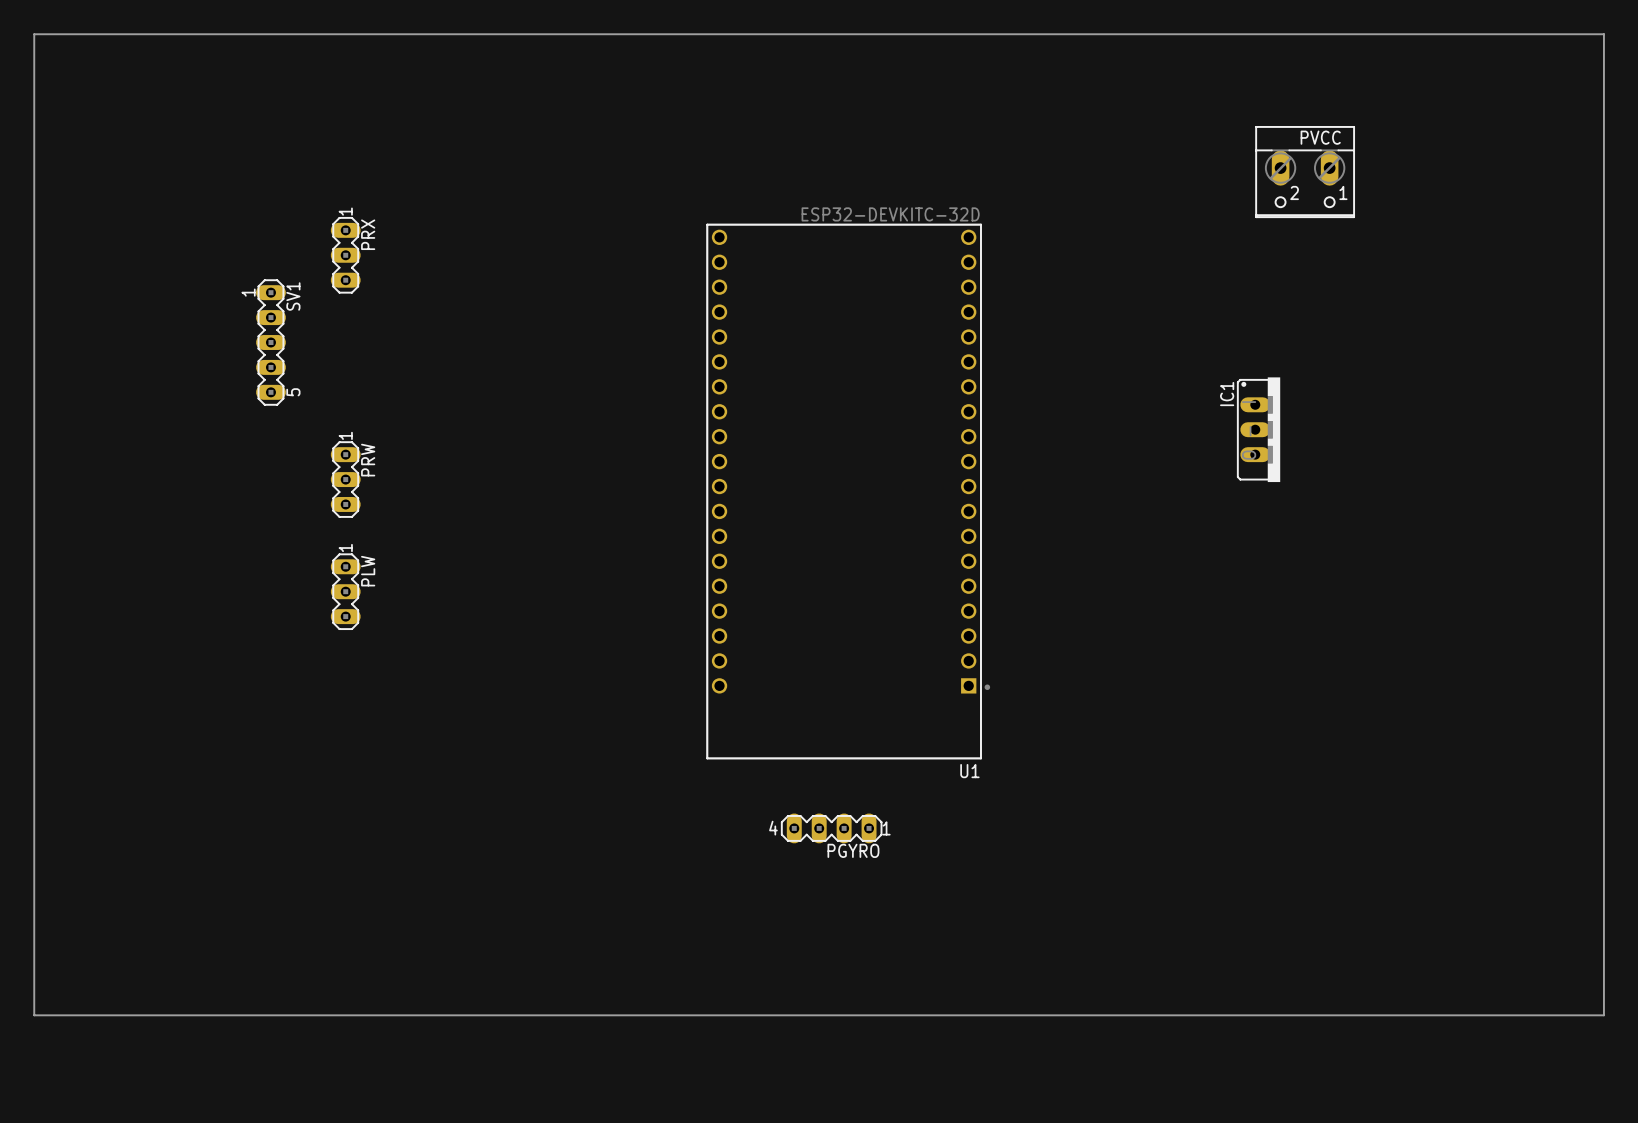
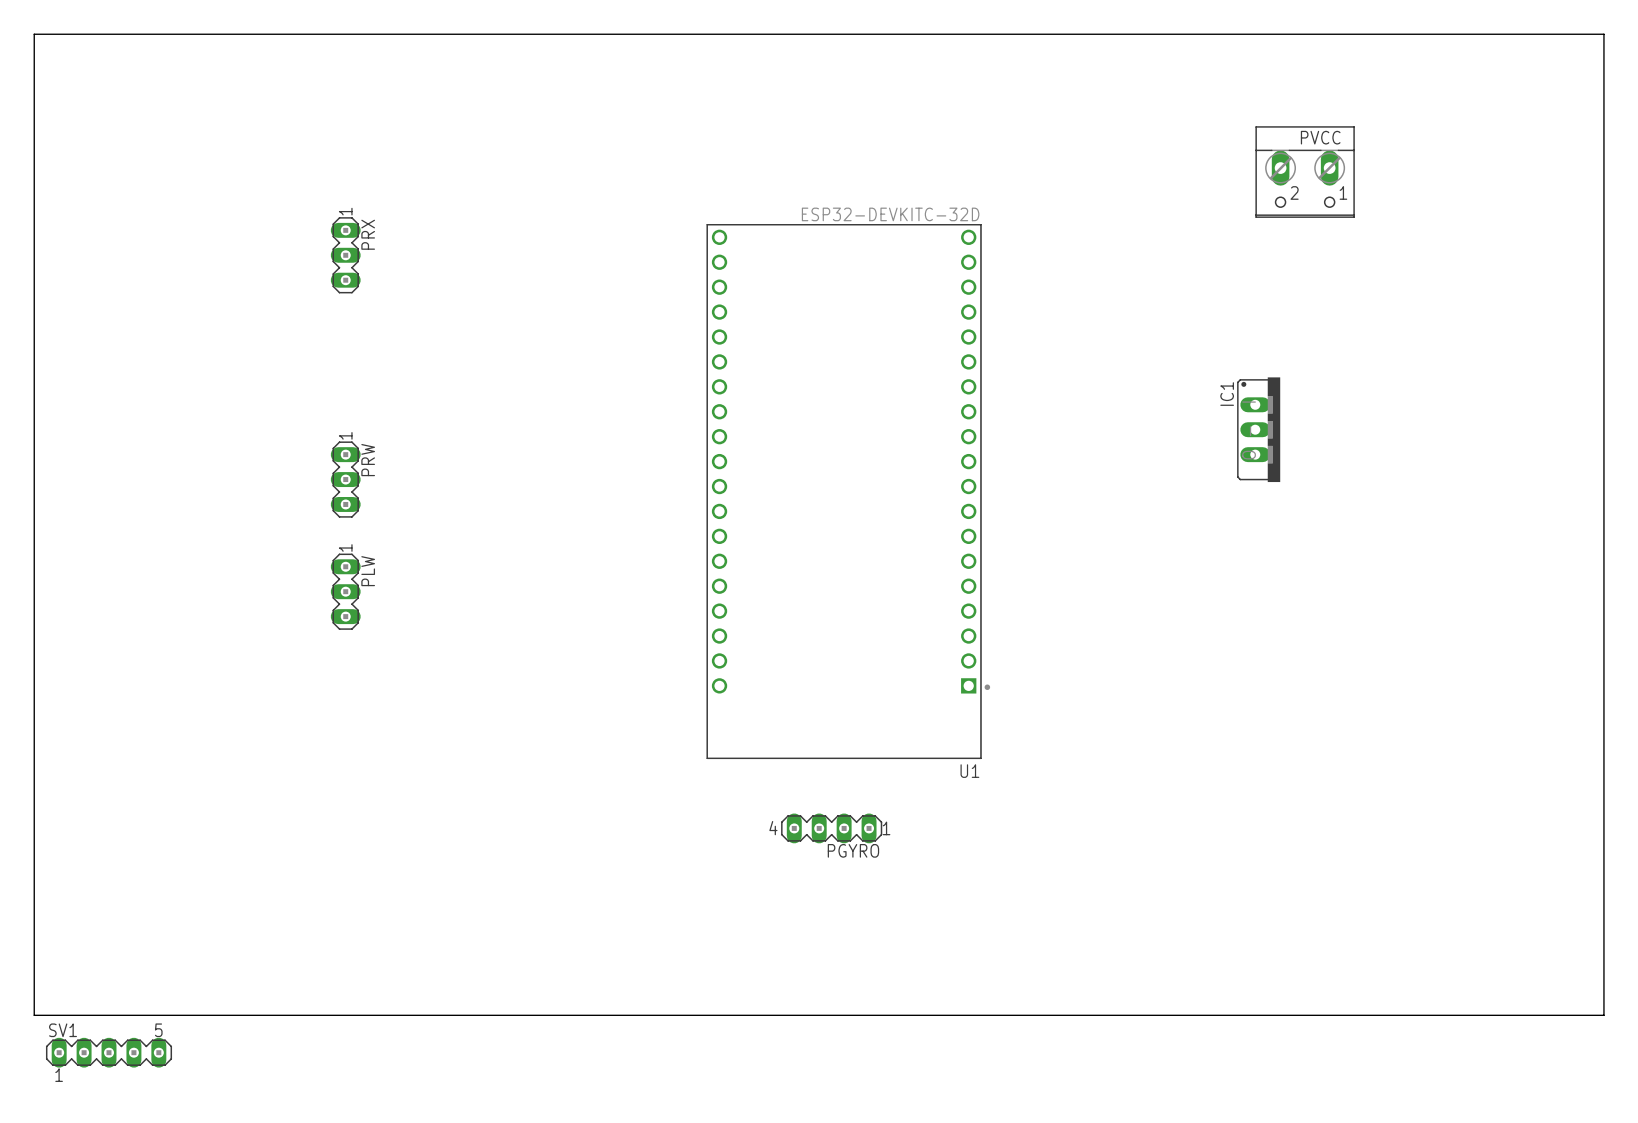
SV1 footprint: [256, 279, 286, 406] -> [45, 1037, 173, 1068]
SV1 name position: SV1 (293, 296) -> SV1 (63, 1030)

